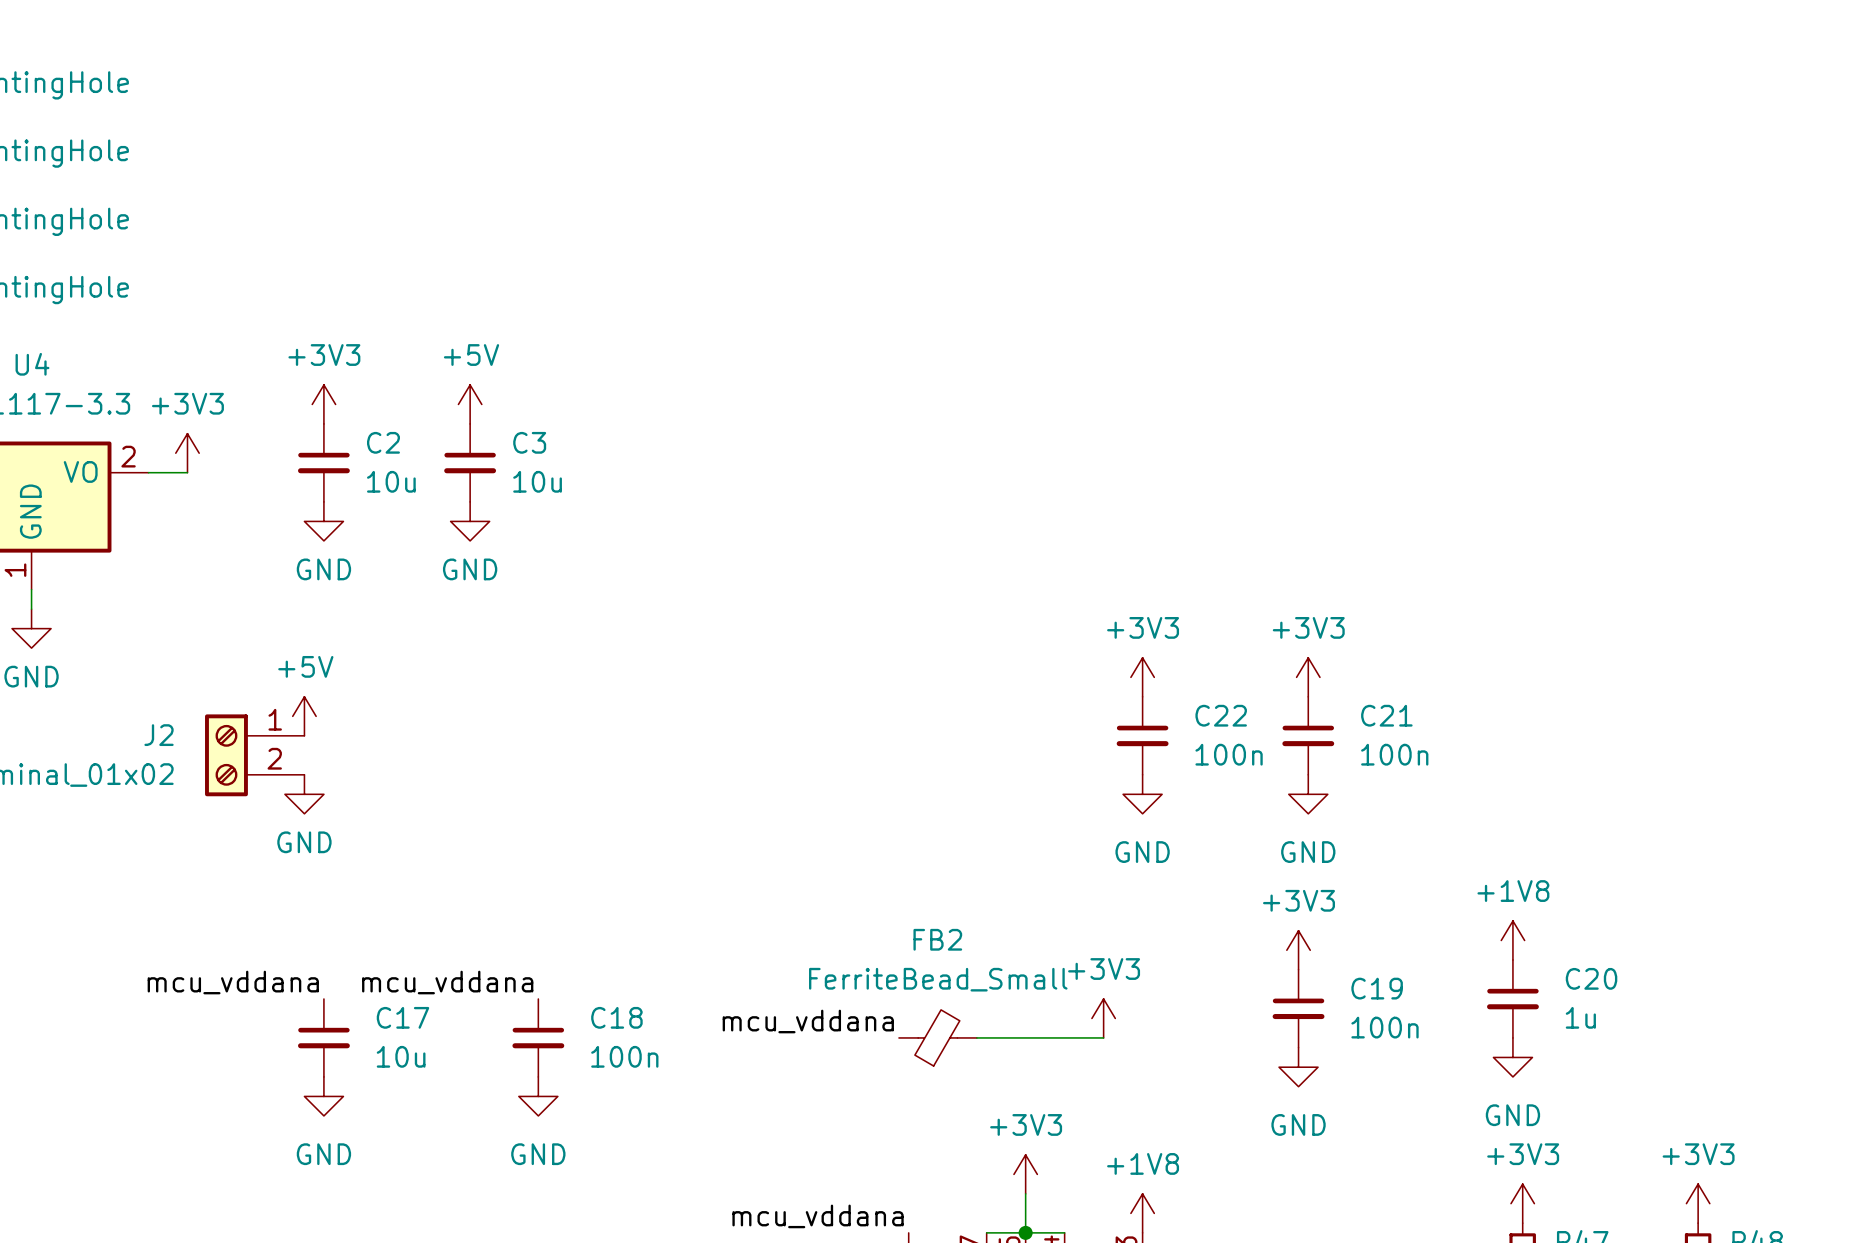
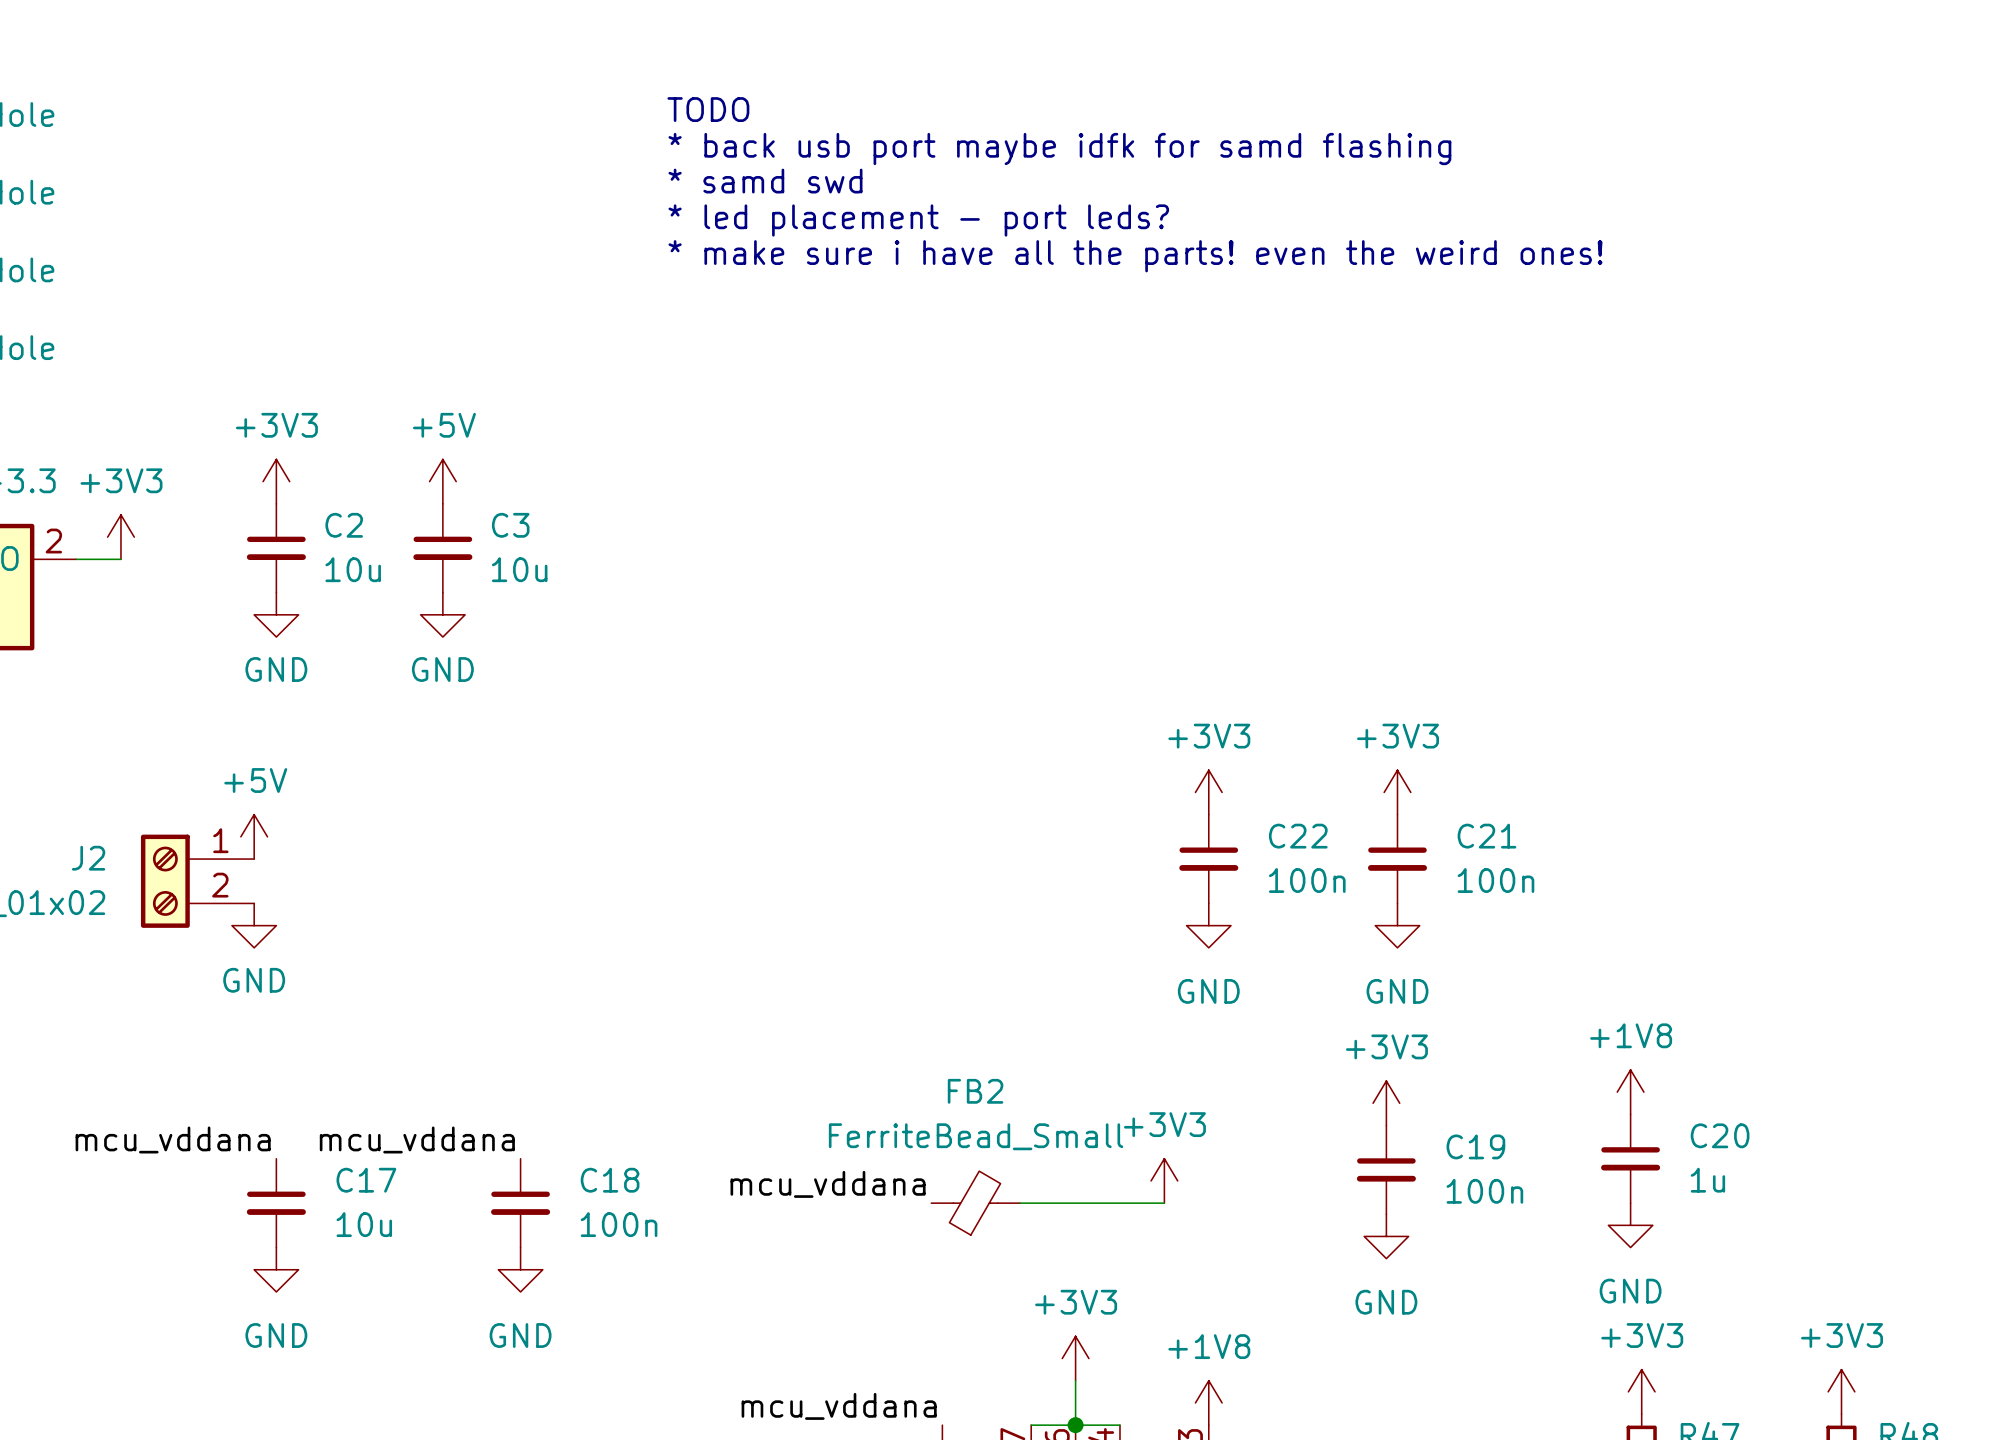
text: none -> TODO (708, 109)
text: none -> * back usb port maybe idfk for samd flashing (1059, 149)
text: none -> * samd swd (765, 181)
text: none -> * led placement - port leds? (918, 220)
text: none -> * make sure i have all the parts! even the weird ones! (1135, 256)

